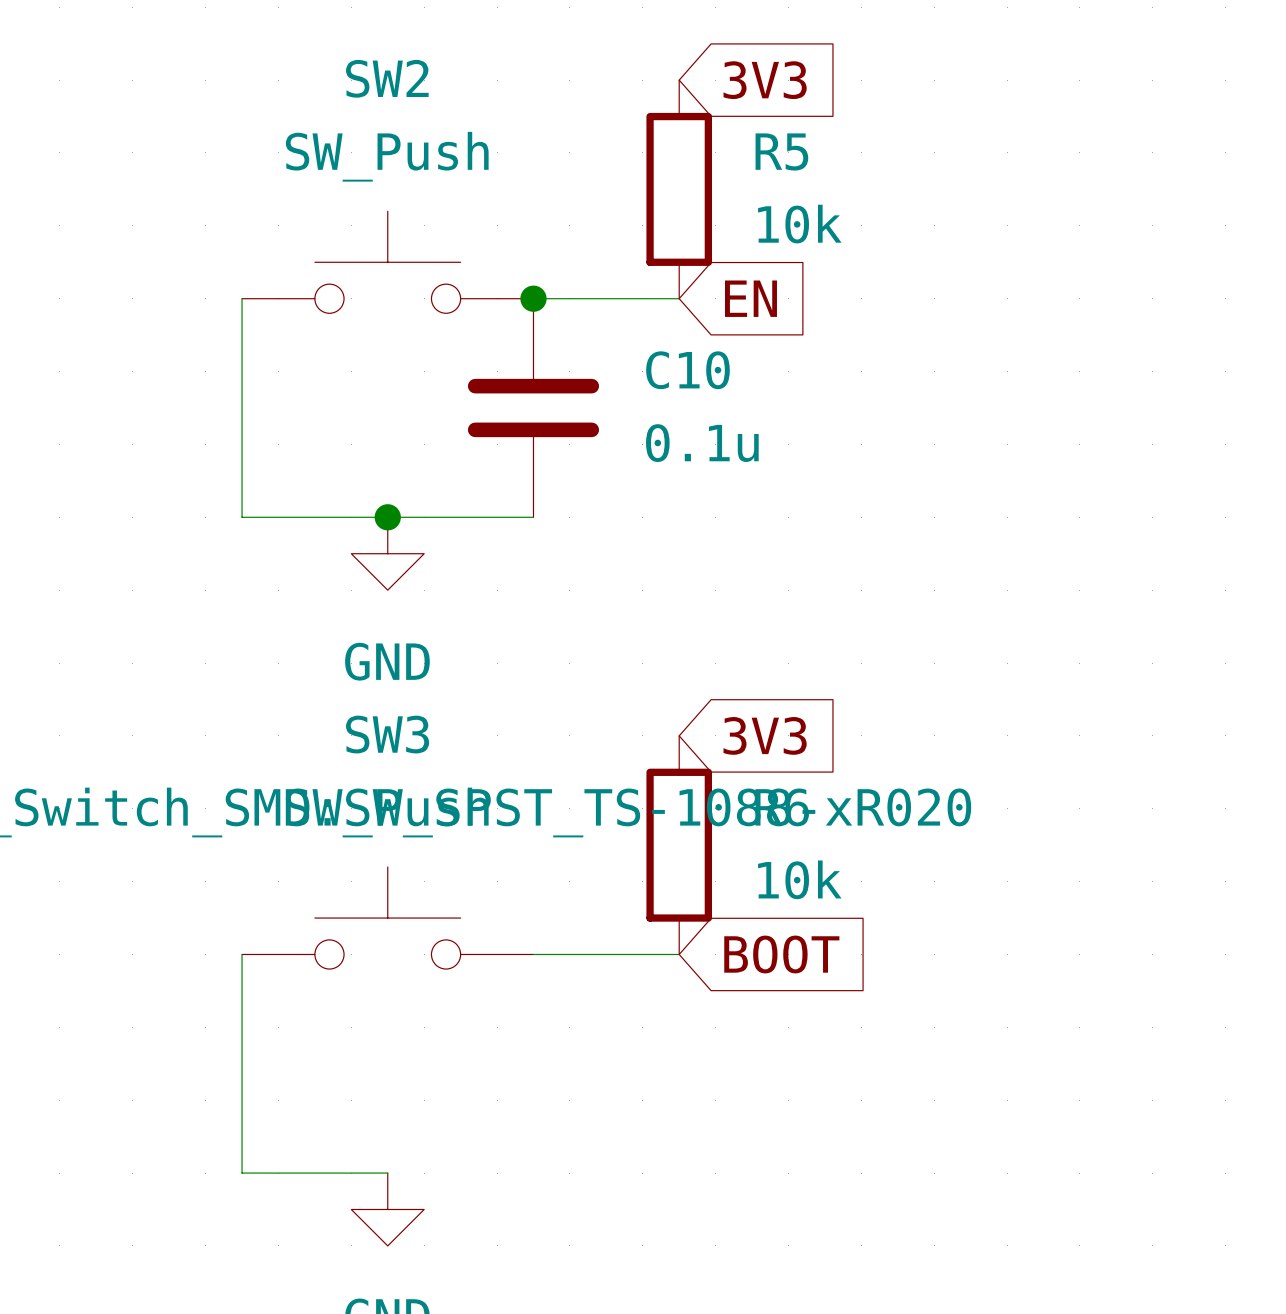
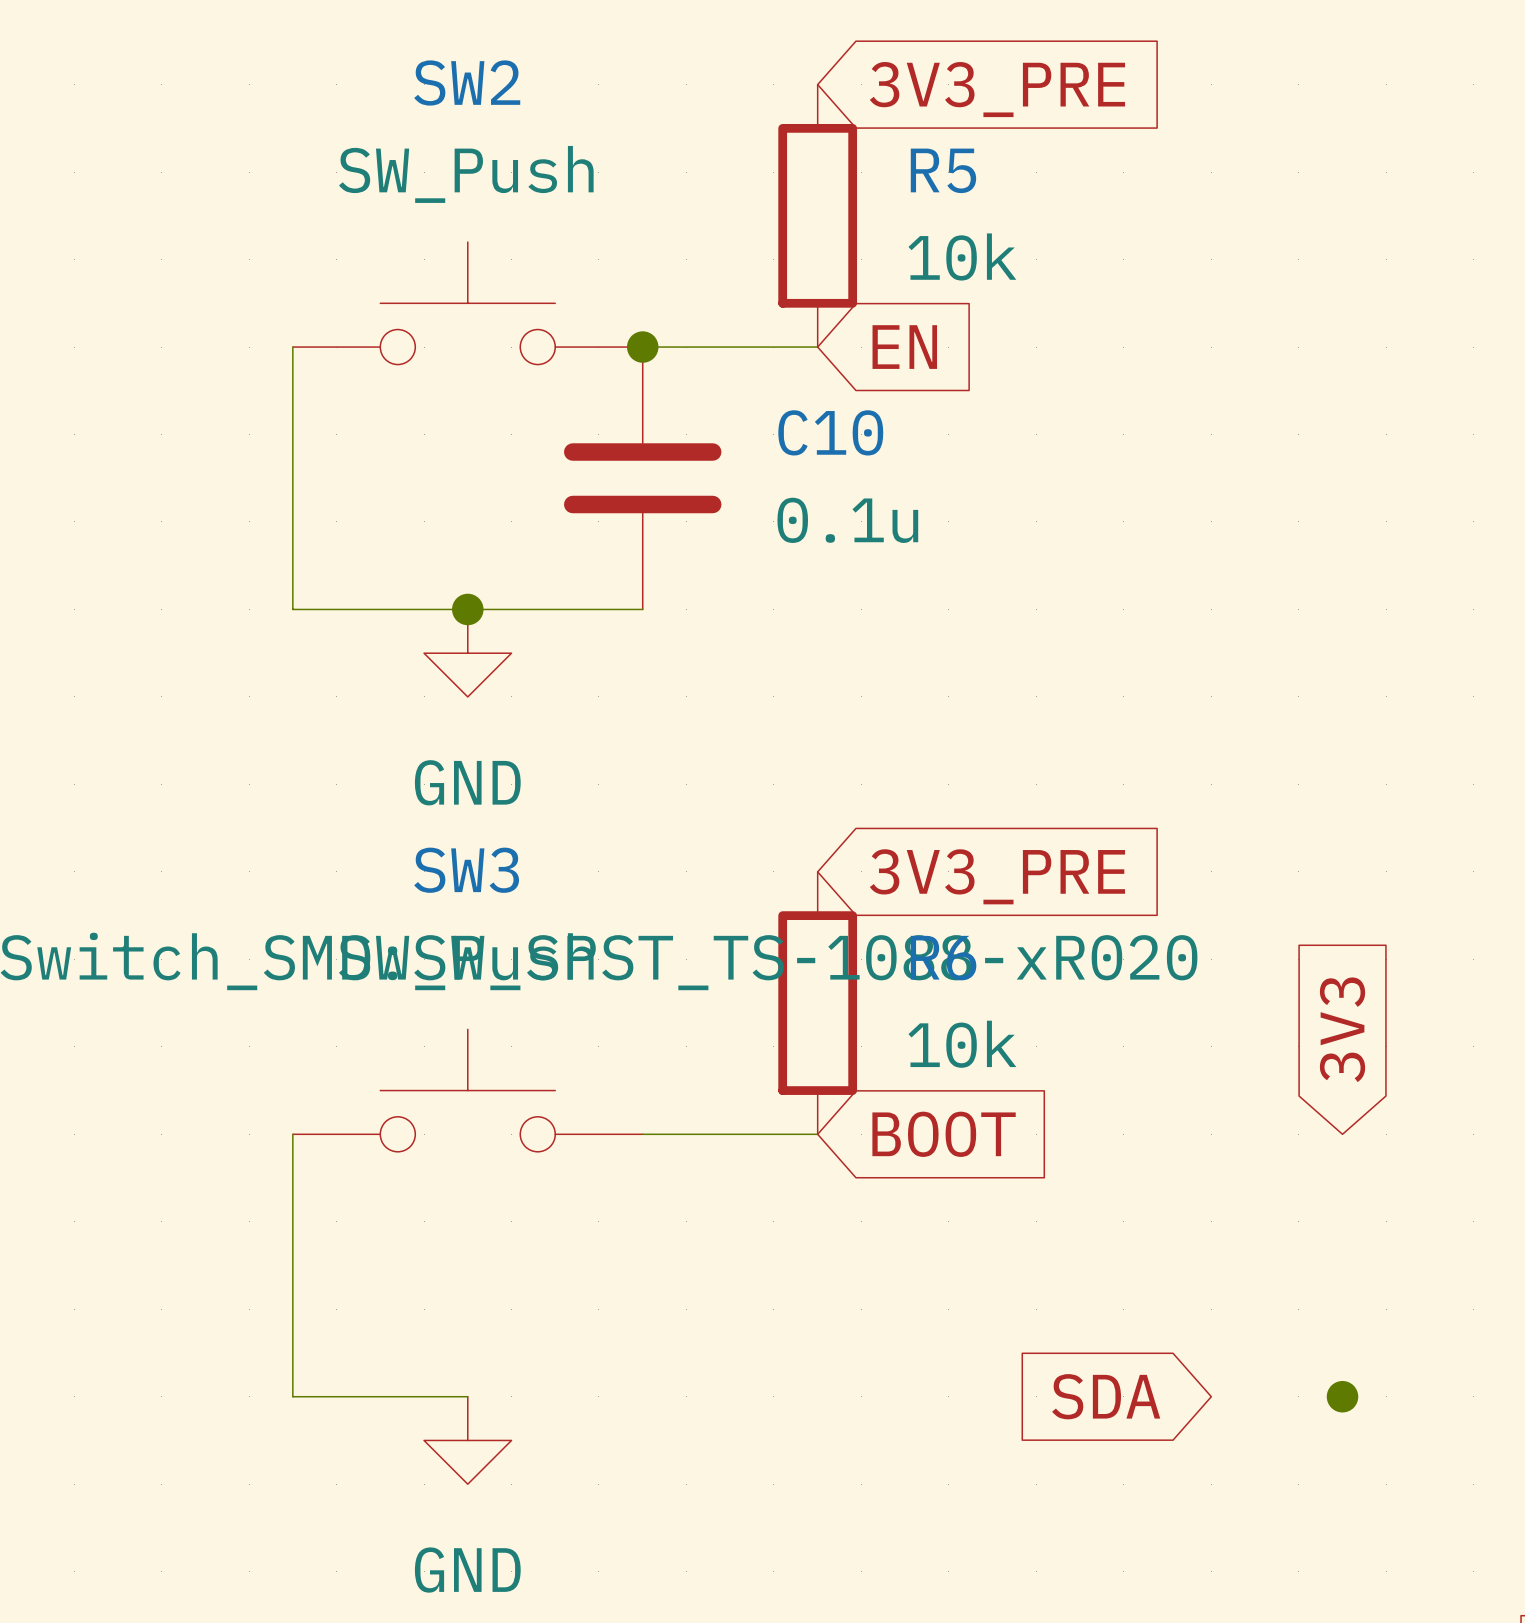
global label: 3V3 (765, 80) -> 3V3_PRE (997, 89)
global label: 3V3 (765, 735) -> 3V3_PRE (997, 876)
global label: none -> 3V3 (1342, 1029)
global label: none -> SDA (1106, 1396)
junction: none -> (1342, 1396)

